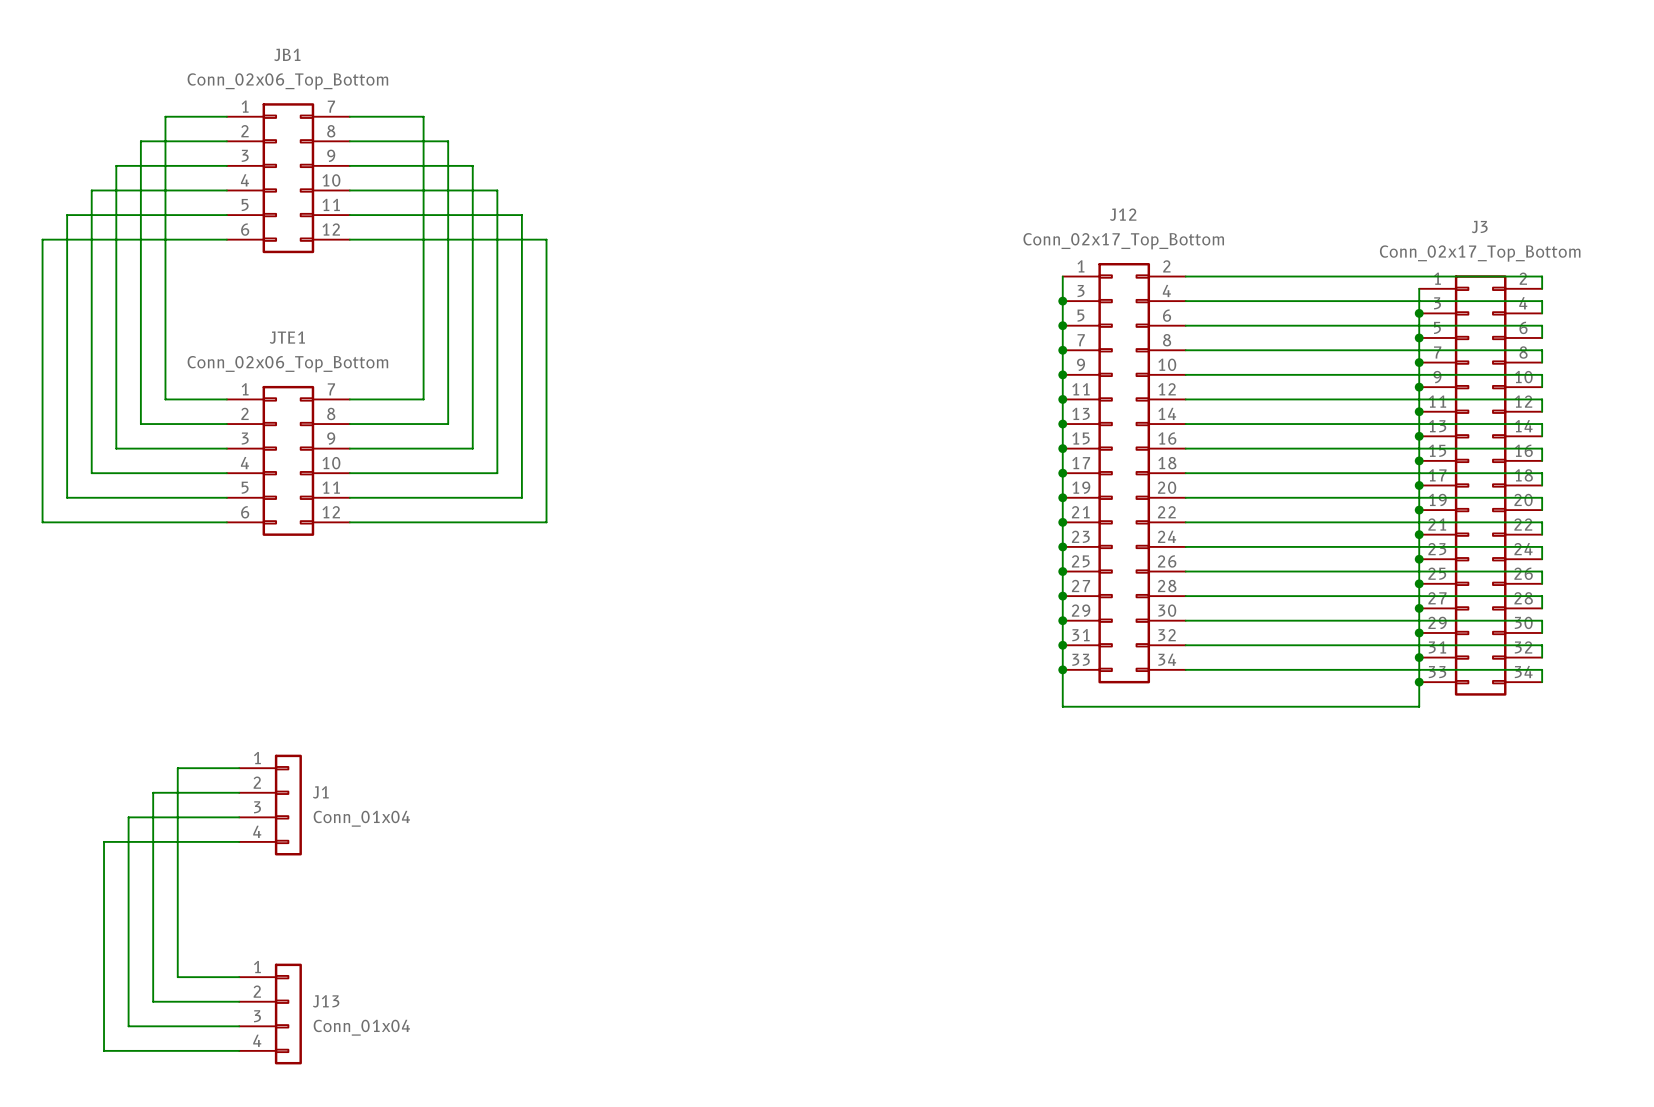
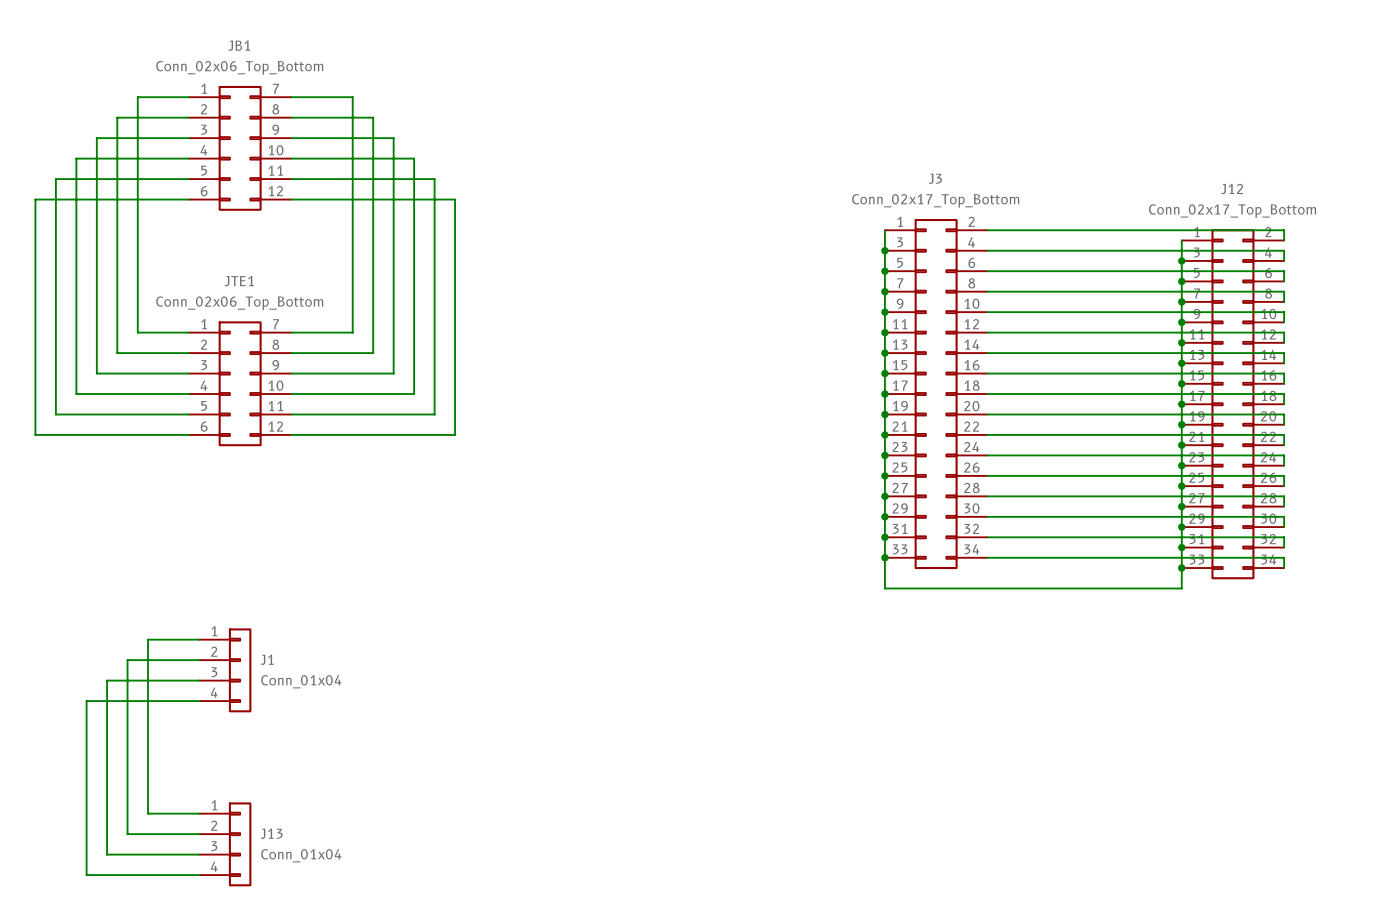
J12 name: J12 (1123, 214) -> J3 (935, 178)
J3 name: J3 (1479, 226) -> J12 (1232, 188)

